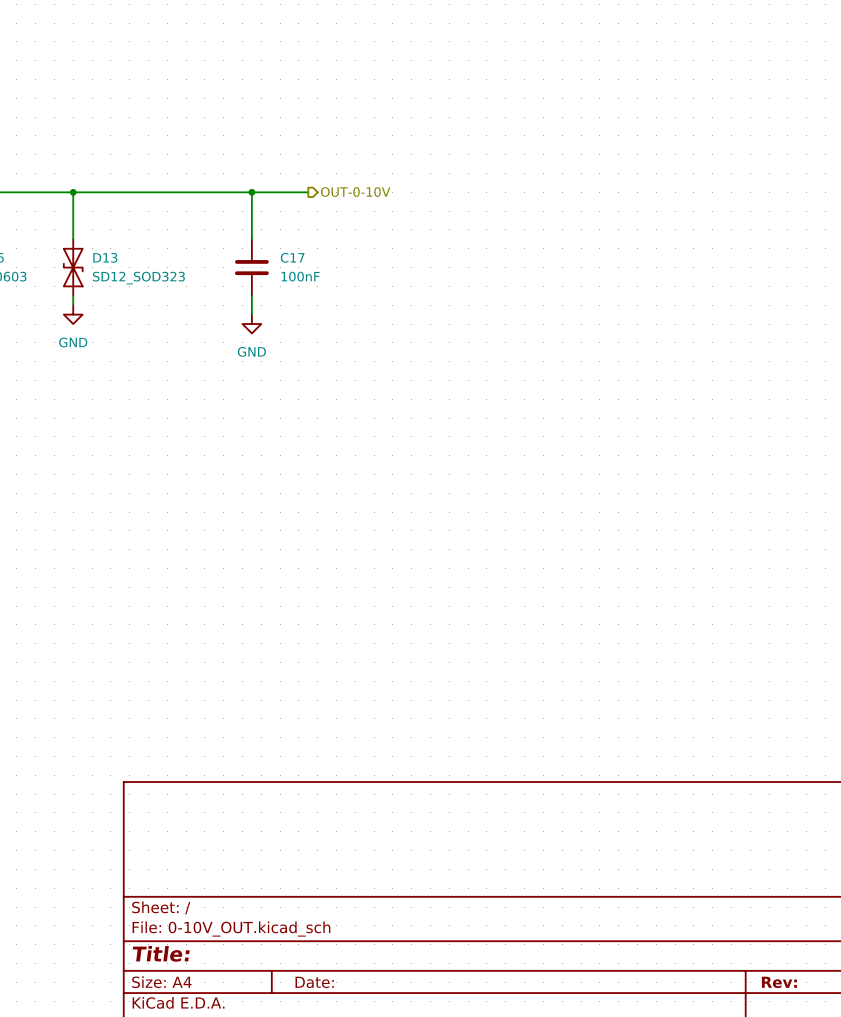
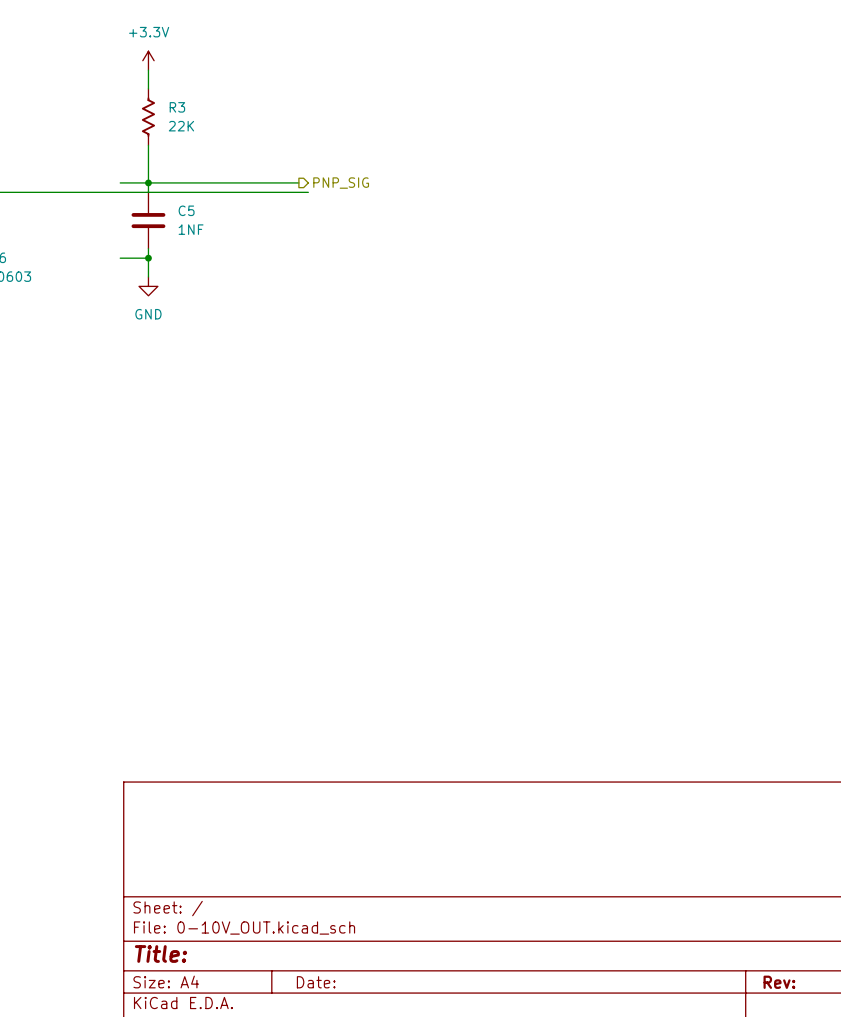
power symbol: none -> +3.3V (148, 60)
wire: none -> (148, 70) (148, 88)
R3: none -> 22K (148, 117)
wire: none -> (120, 182) (298, 182)
junction: none -> (148, 182)
hierarchical label: none -> PNP_SIG (341, 183)
wire: (73, 192) (73, 239) -> (148, 145) (148, 192)
junction: (73, 192) -> none
wire: (251, 192) (251, 239) -> none
junction: (251, 192) -> none
hierarchical label: OUT-0-10V (355, 192) -> none
C5: none -> 1NF (148, 220)
wire: none -> (148, 248) (148, 276)
wire: none -> (120, 258) (148, 258)
junction: none -> (148, 258)
D13: SD12_SOD323 (73, 267) -> none
C17: 100nF (251, 267) -> none
power symbol: none -> GND (148, 286)
wire: (73, 295) (73, 305) -> none
wire: (251, 295) (251, 314) -> none
power symbol: GND (73, 314) -> none
power symbol: GND (251, 324) -> none

